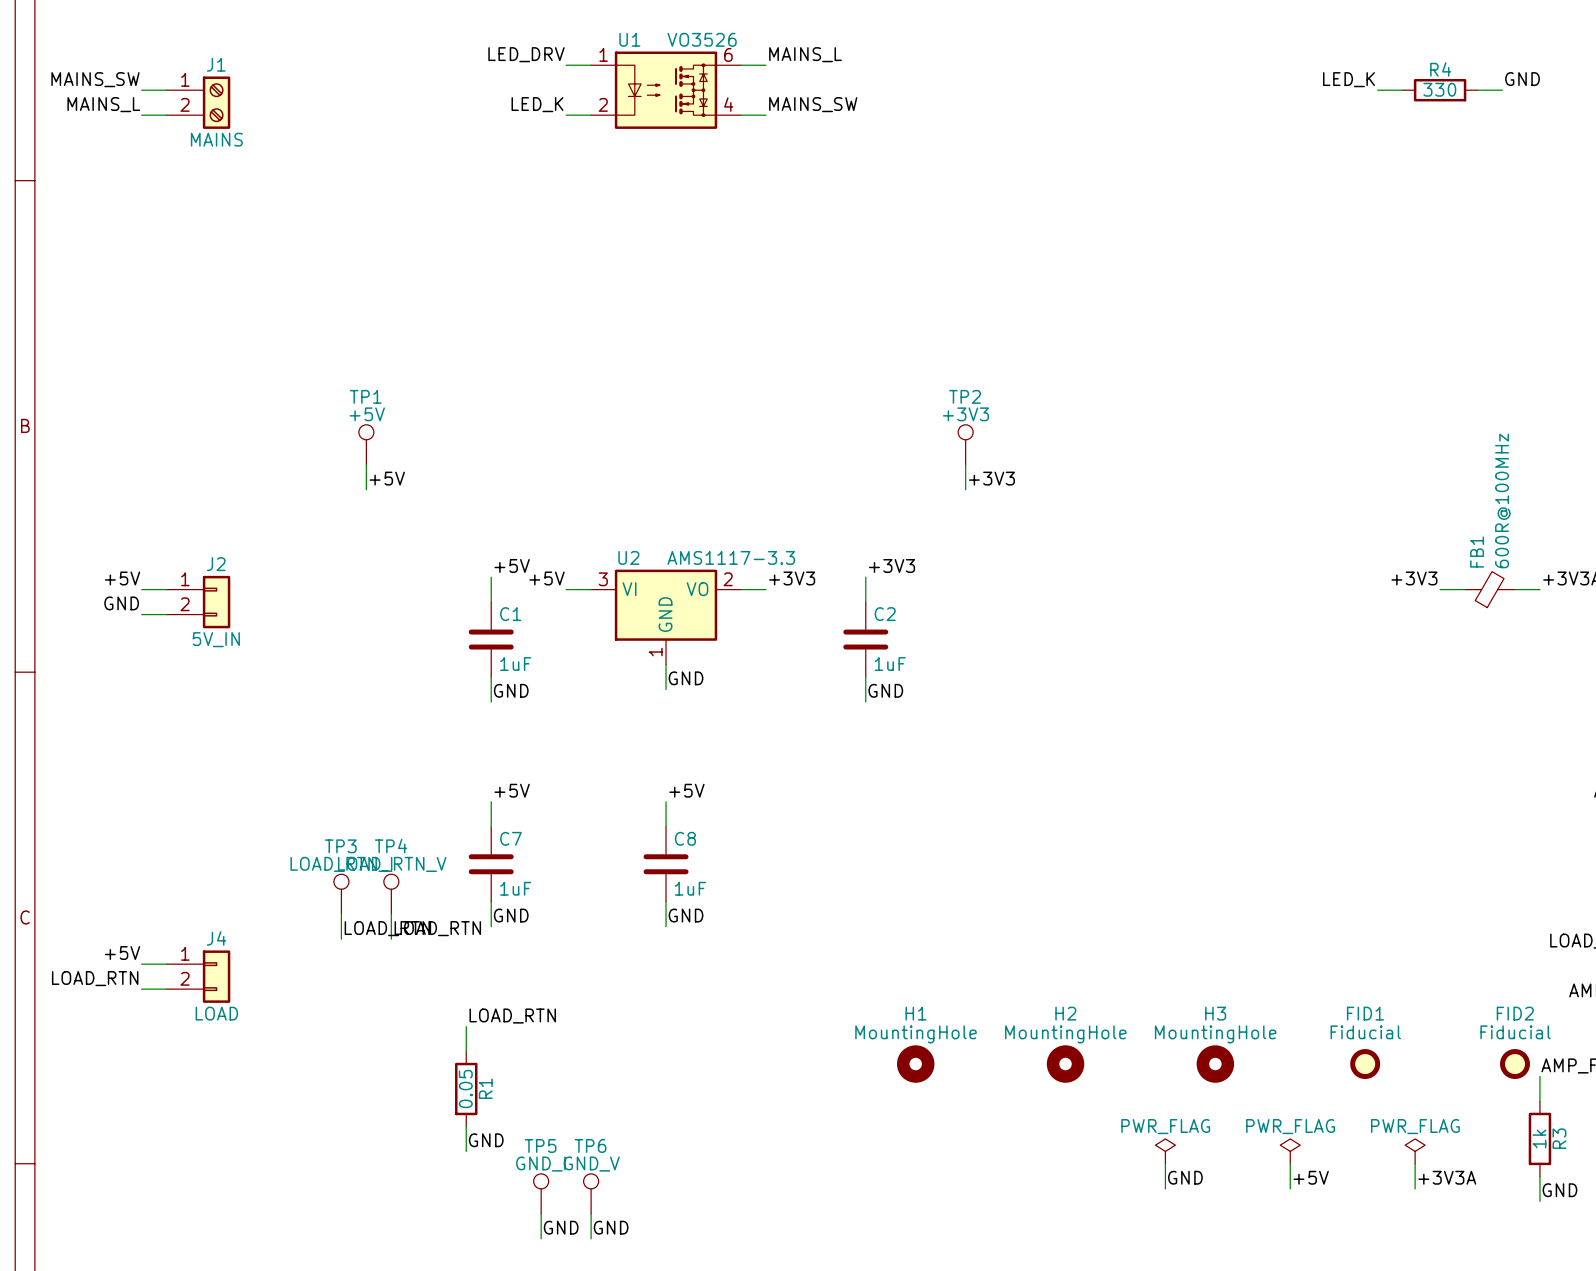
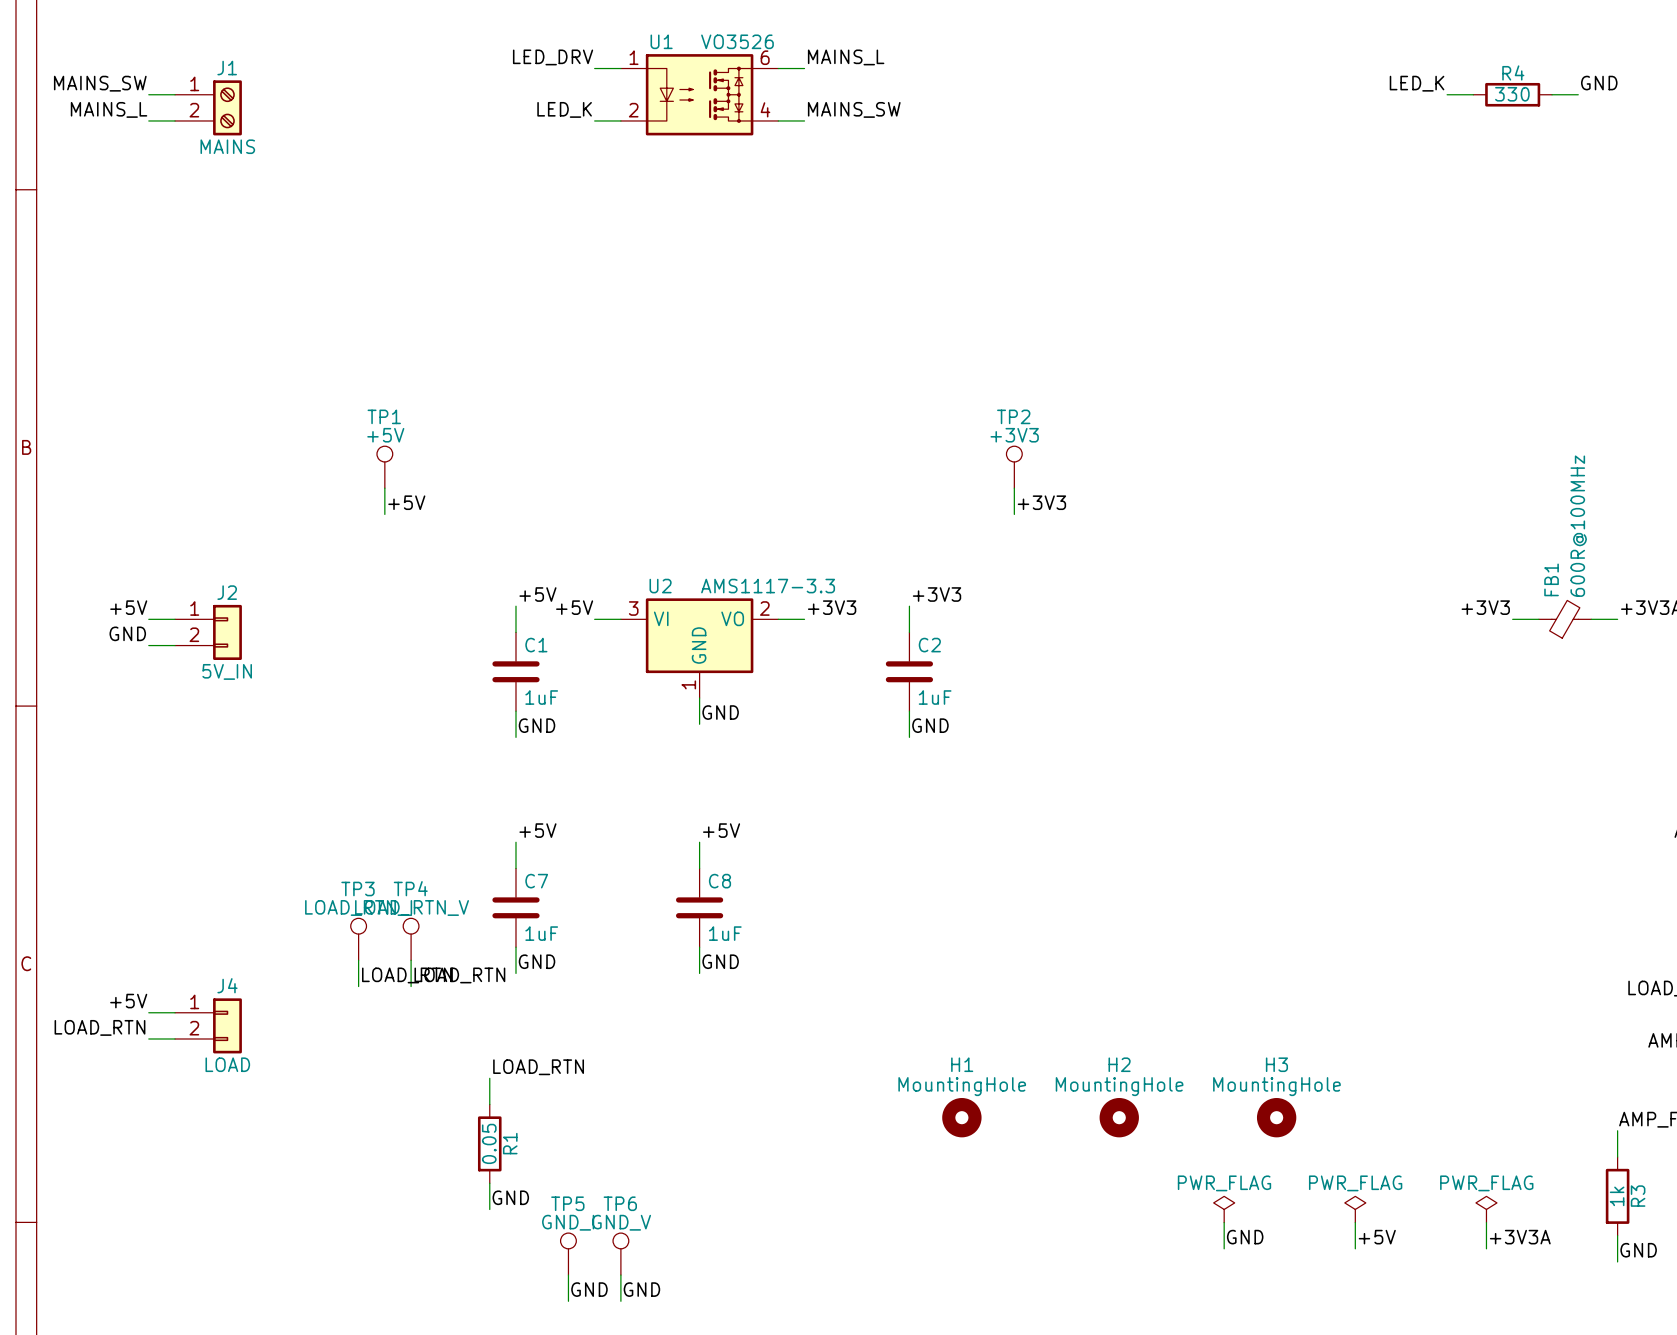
FID1: Fiducial (1365, 1064) -> none
FID2: Fiducial (1514, 1064) -> none

